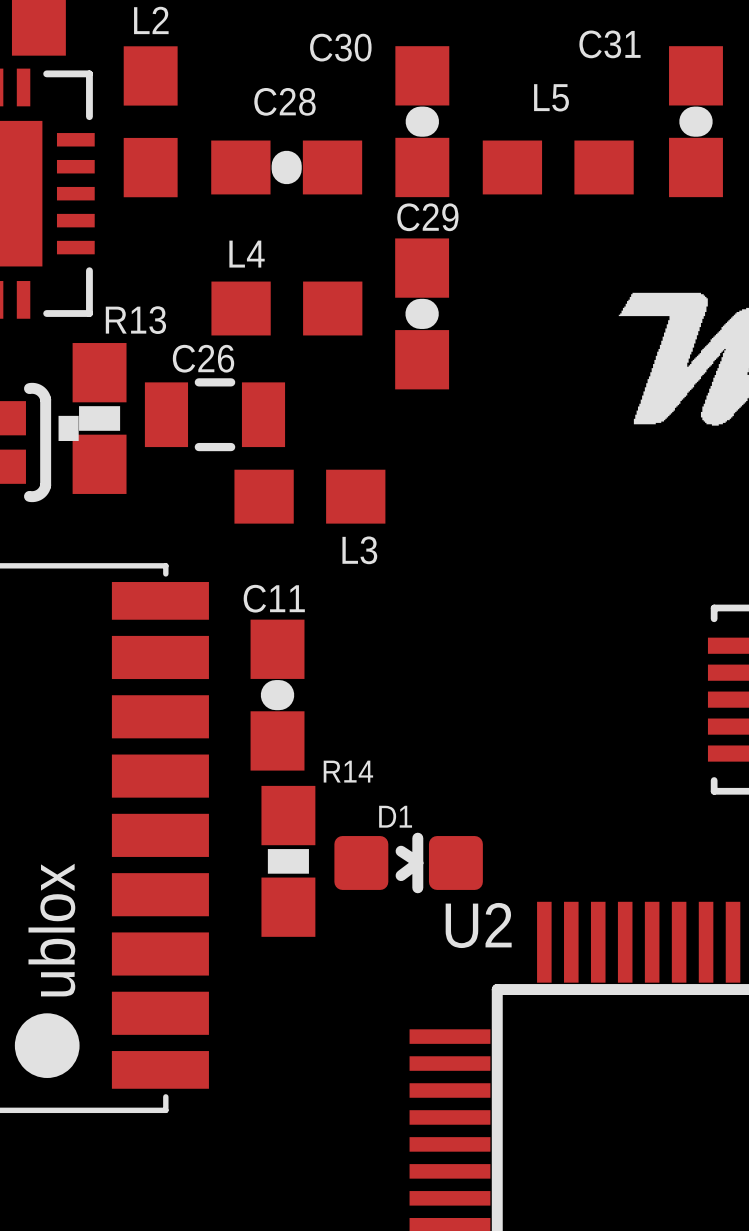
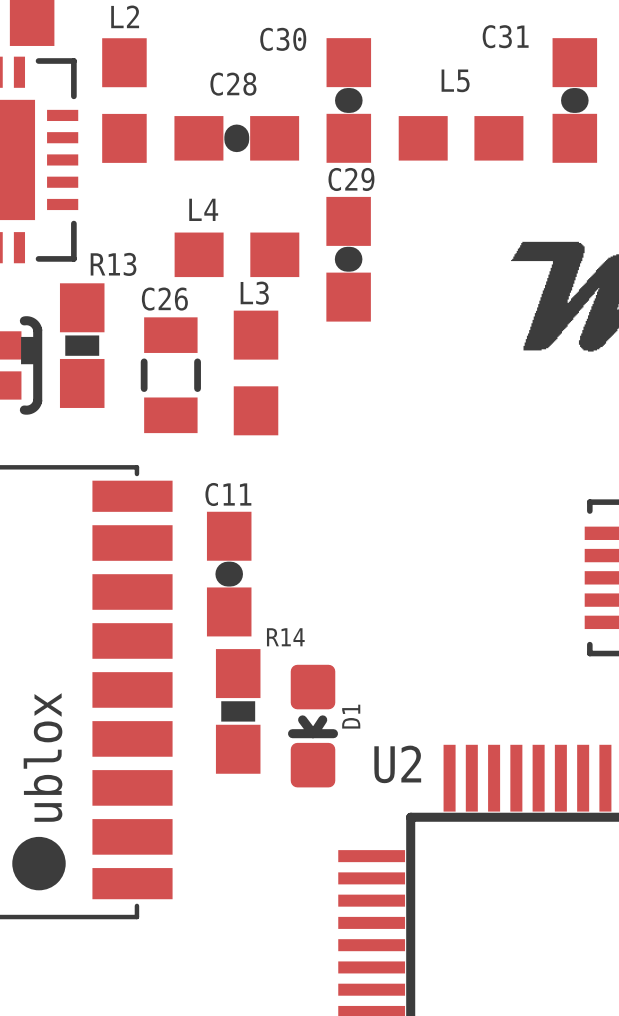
C26 rotation: 0° (214, 414) -> 90° clockwise (170, 375)
L3 rotation: 0° (309, 496) -> 90° clockwise (256, 372)
L3 name position: L3 (359, 550) -> L3 (254, 293)
D1 rotation: 0° (408, 862) -> 90° clockwise (313, 726)

